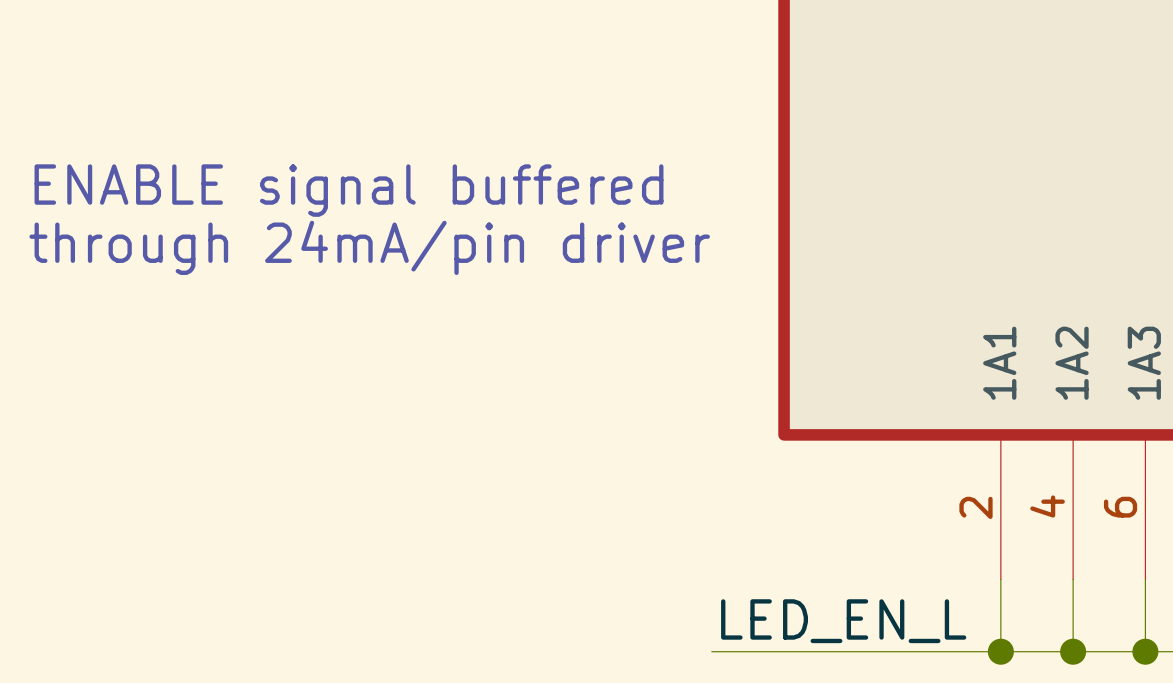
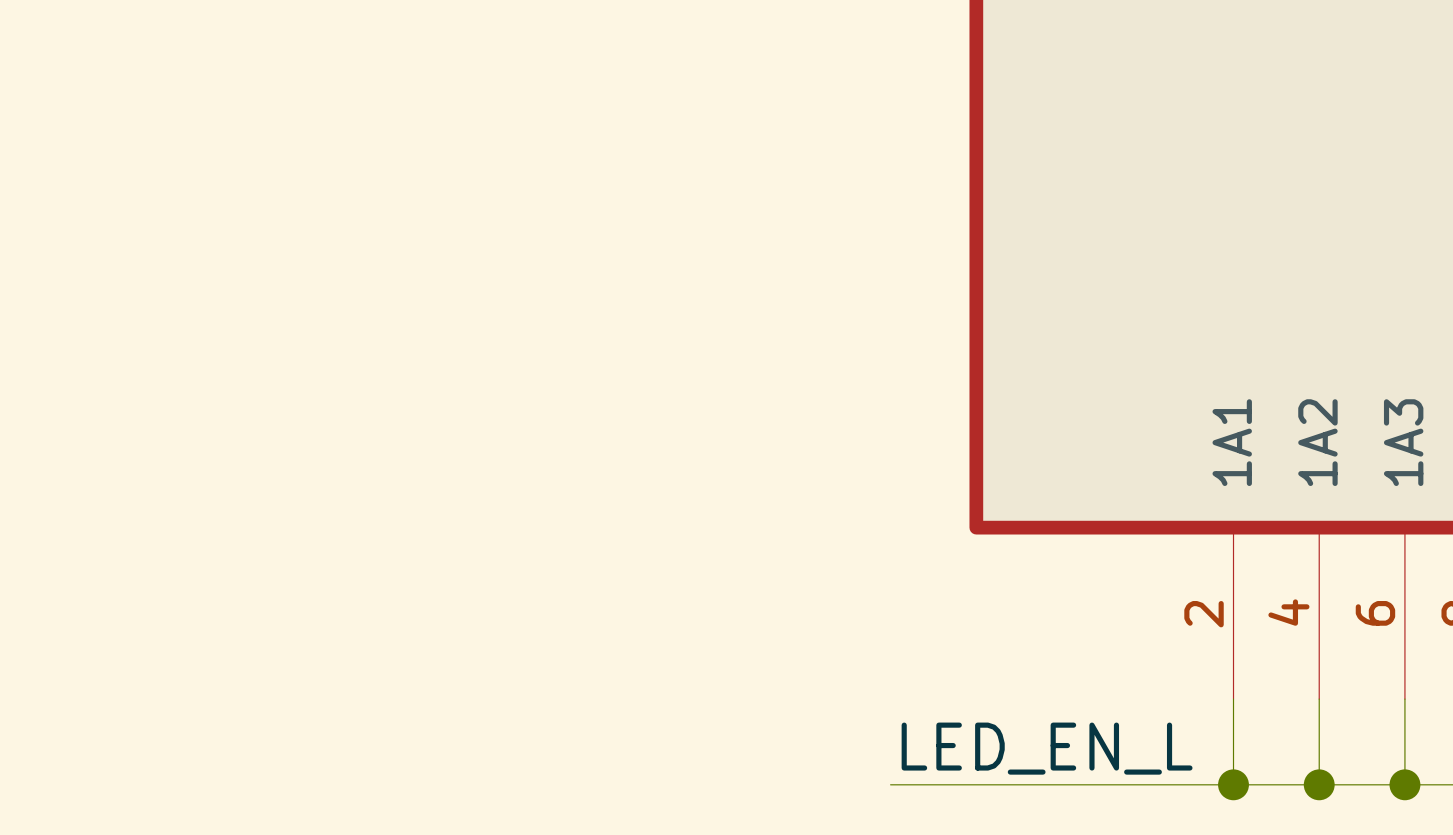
text: ENABLE signal buffered (349, 190) -> none
text: through 24mA/pin driver (369, 247) -> none

